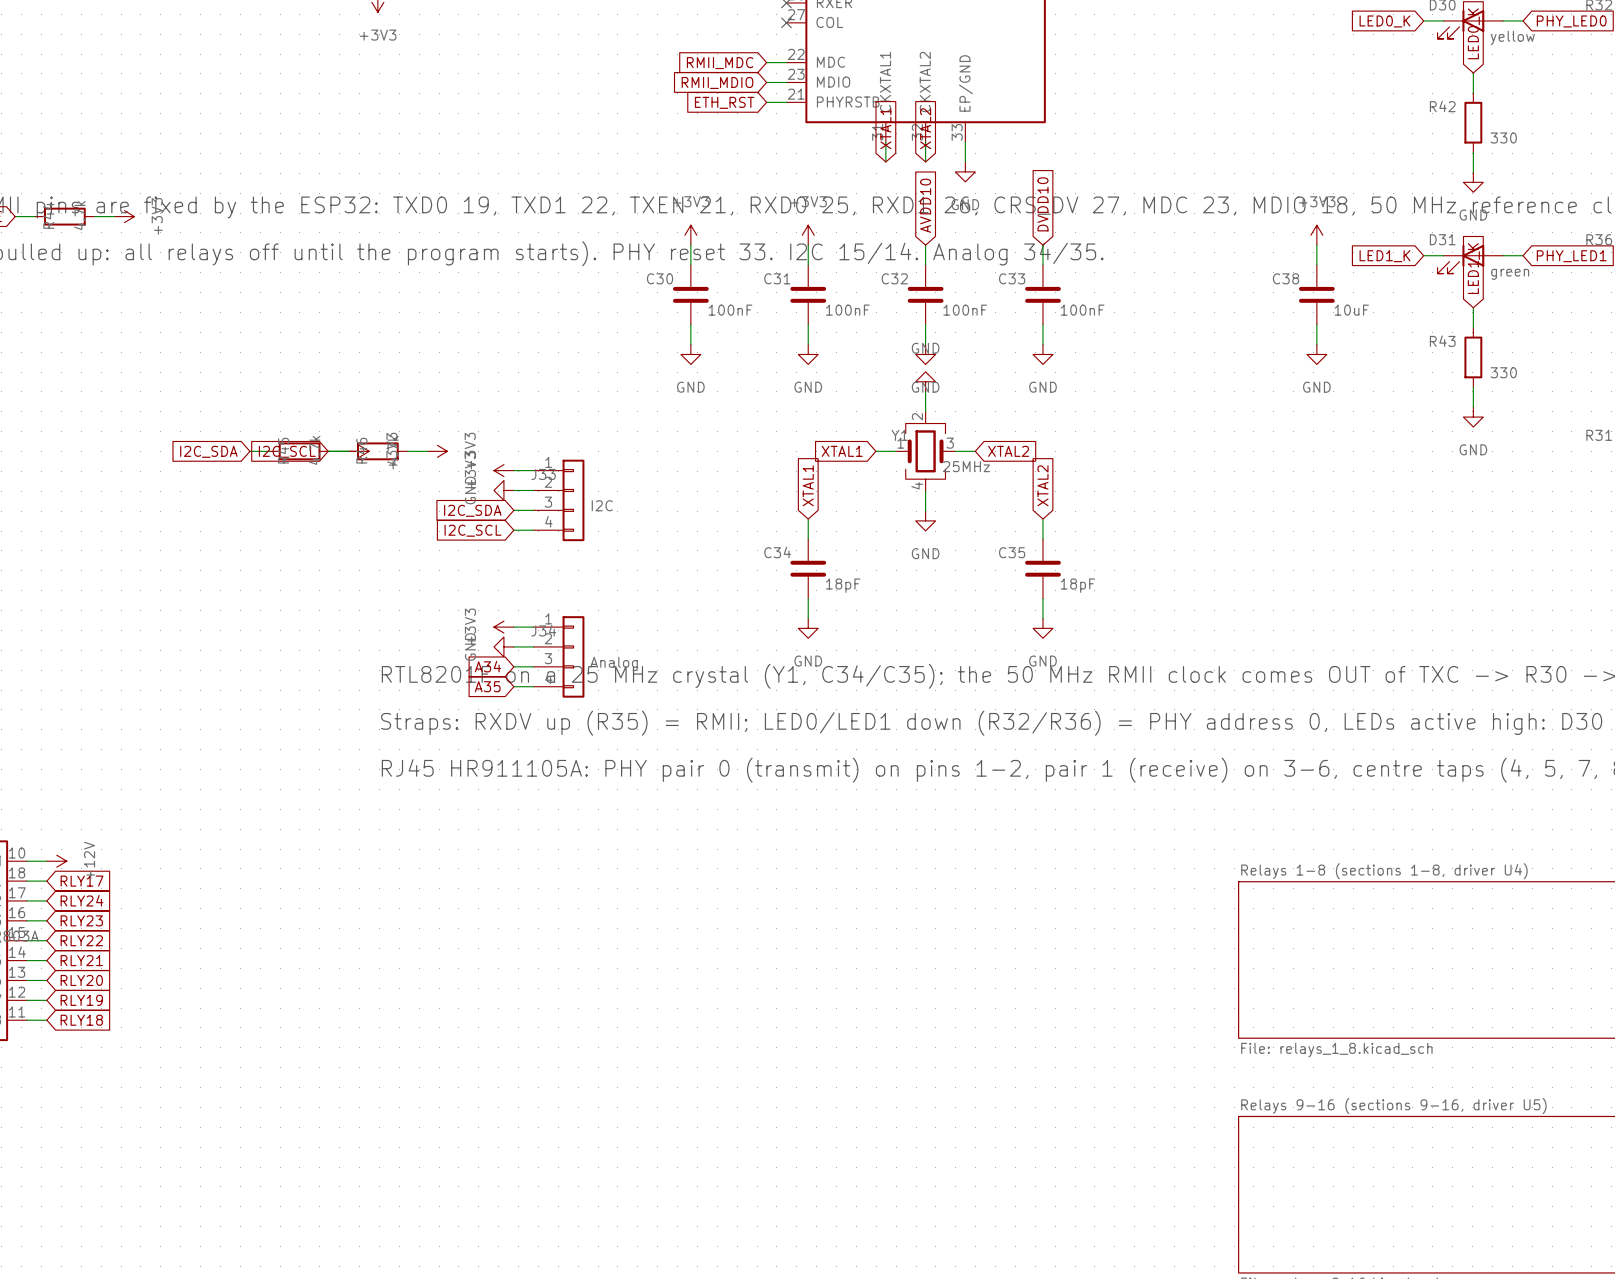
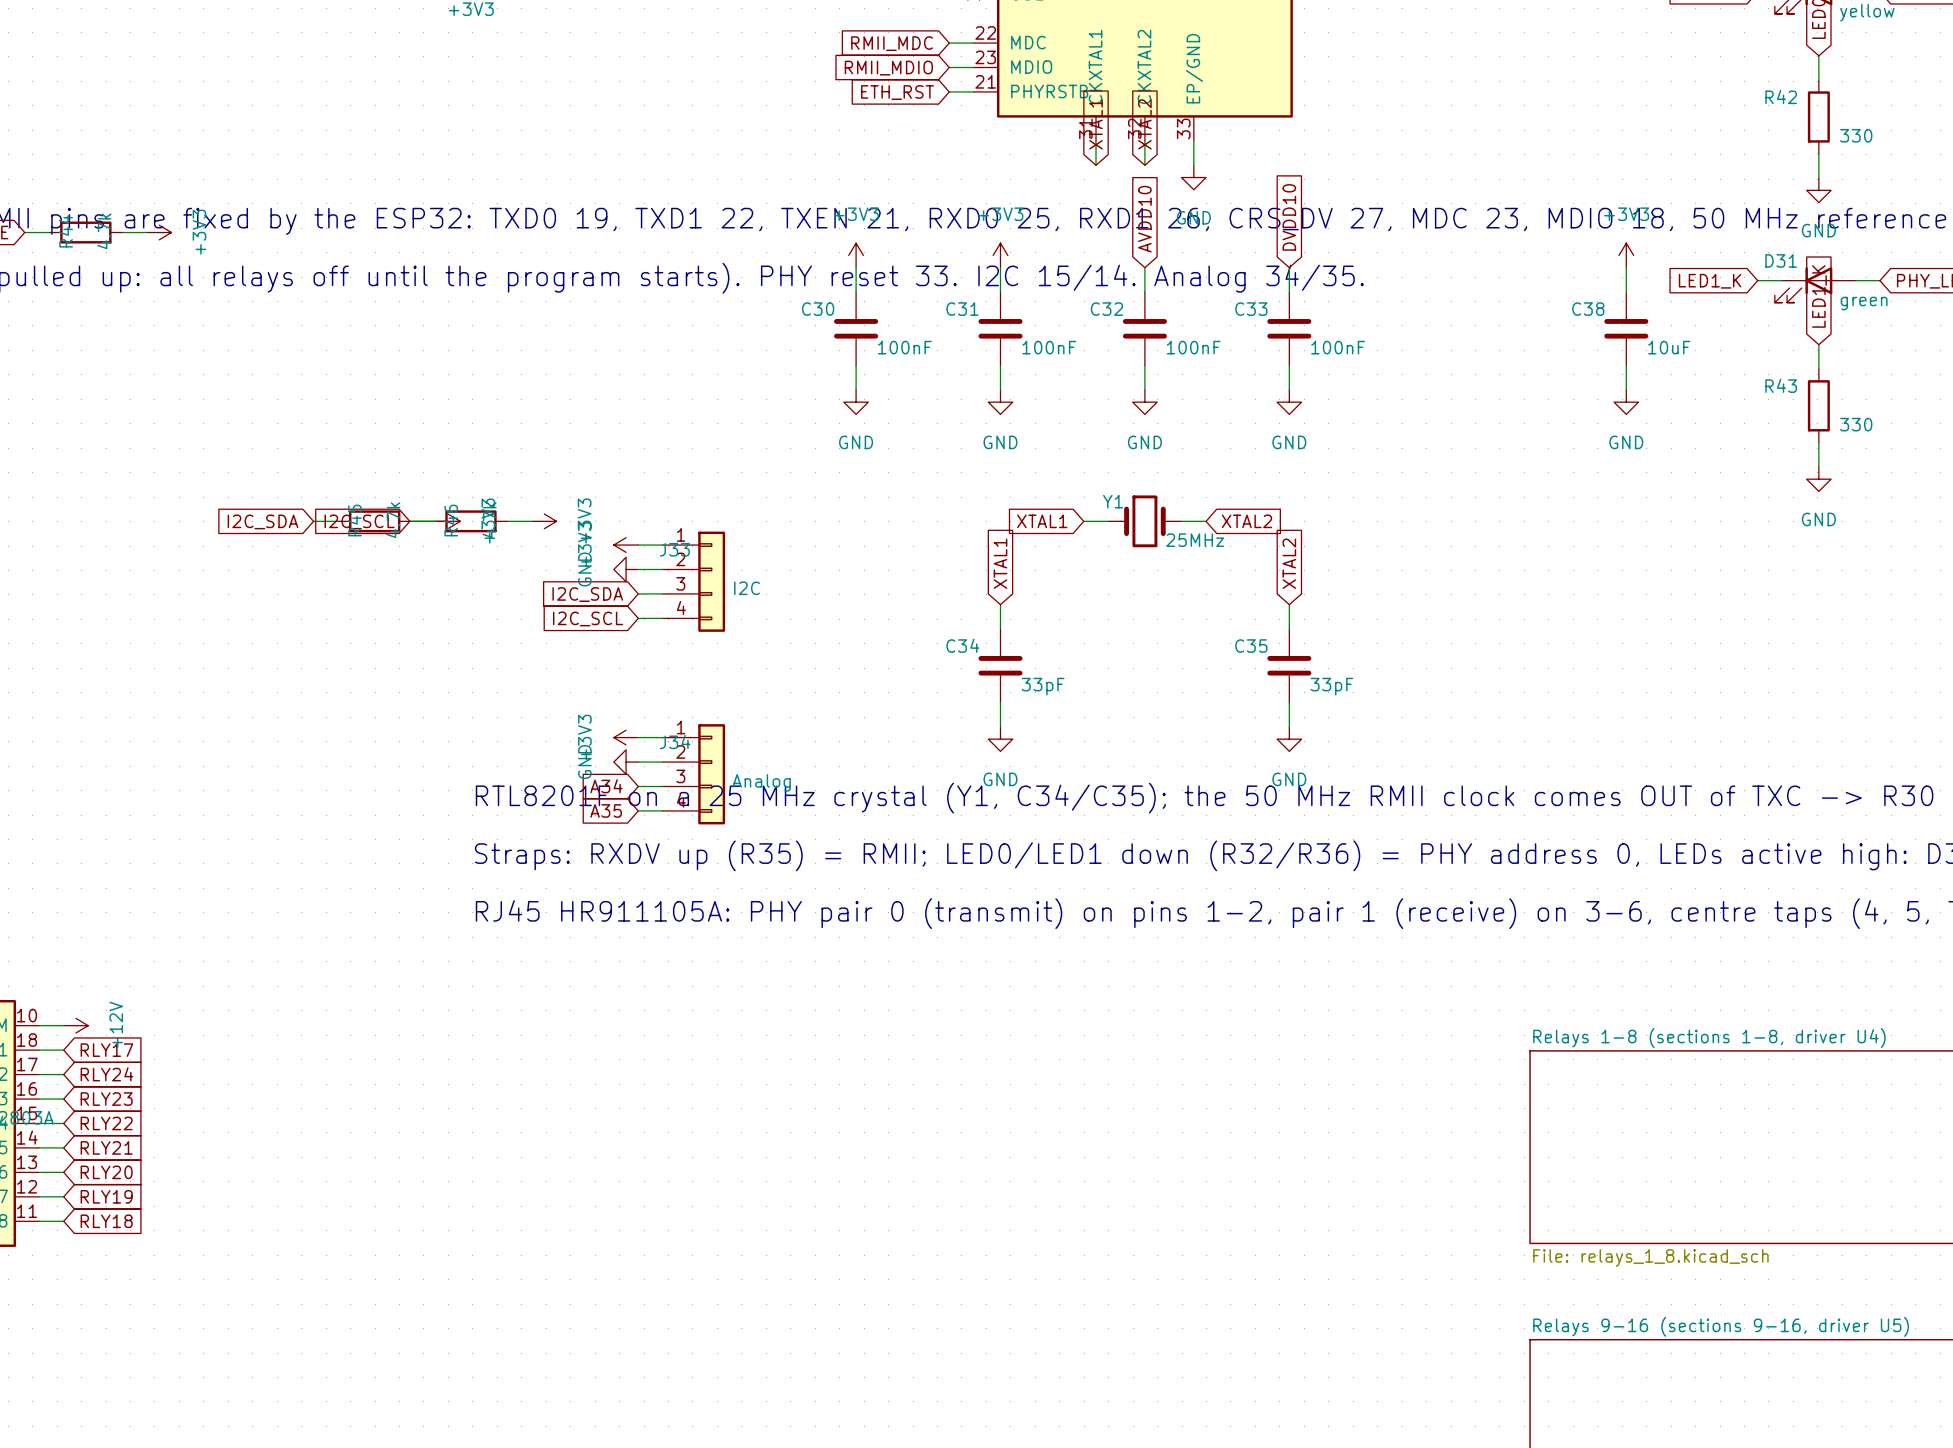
power symbol: GND (925, 381) -> none
wire: (925, 391) (925, 411) -> none
Y1 symbol: [895, 411, 956, 492] -> [1108, 495, 1182, 548]
wire: (925, 491) (925, 510) -> none
power symbol: GND (925, 520) -> none
C34 value: 18pF (843, 585) -> 33pF (1043, 686)
C35 value: 18pF (1077, 585) -> 33pF (1331, 686)

